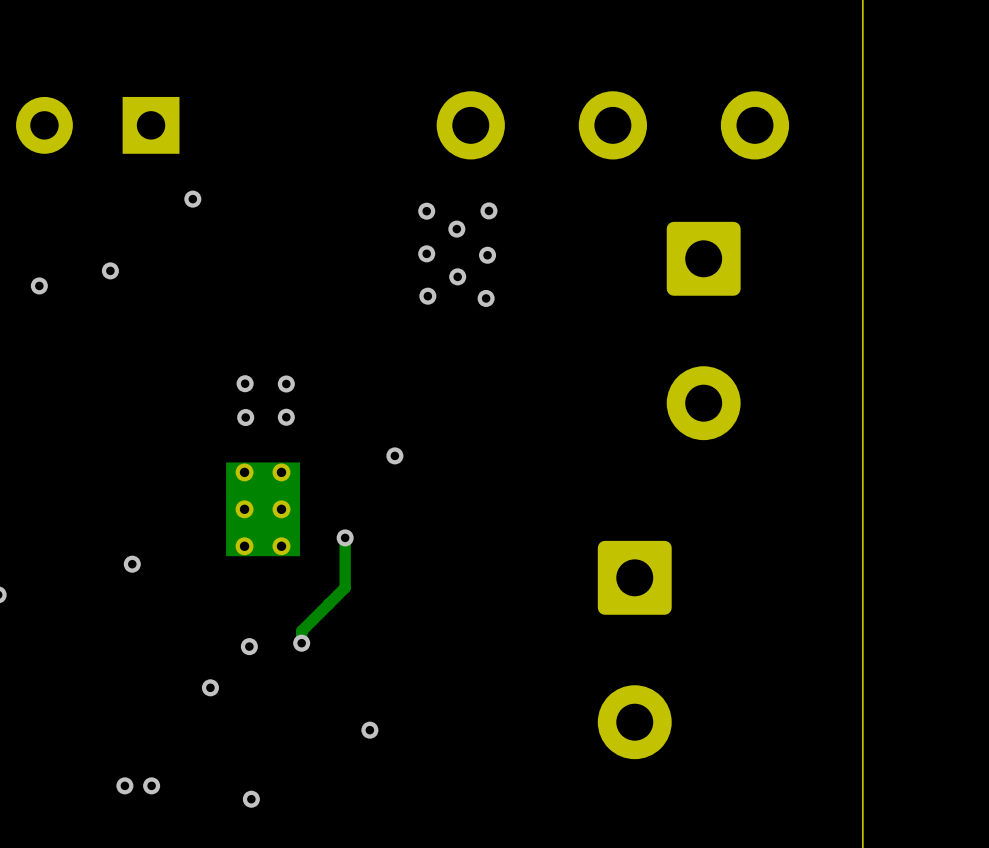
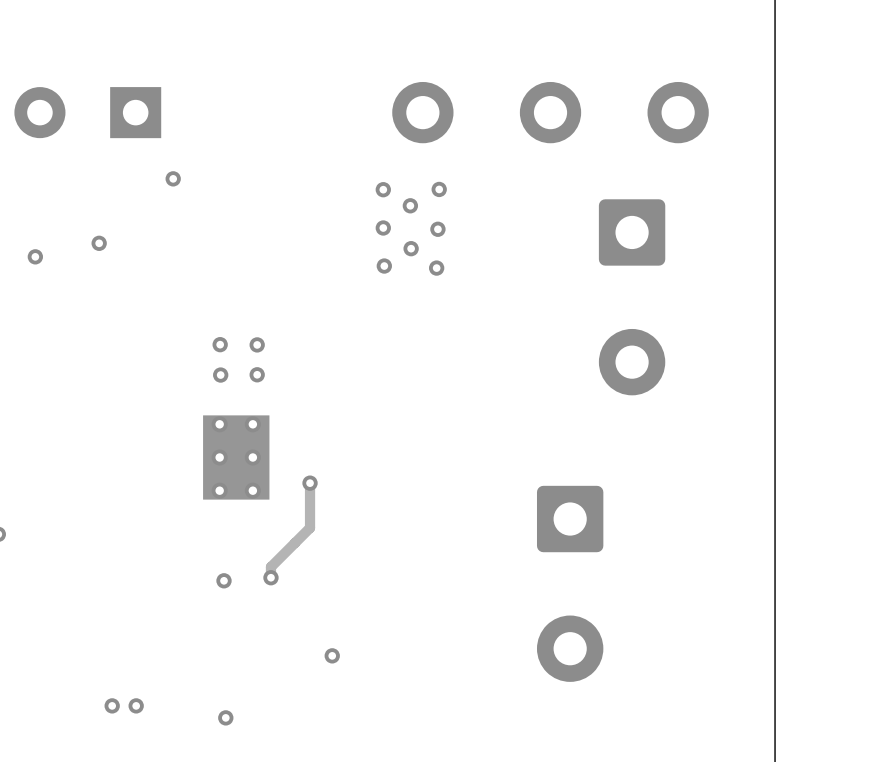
via: (394, 455) -> none
via: (132, 564) -> none
via: (210, 687) -> none

